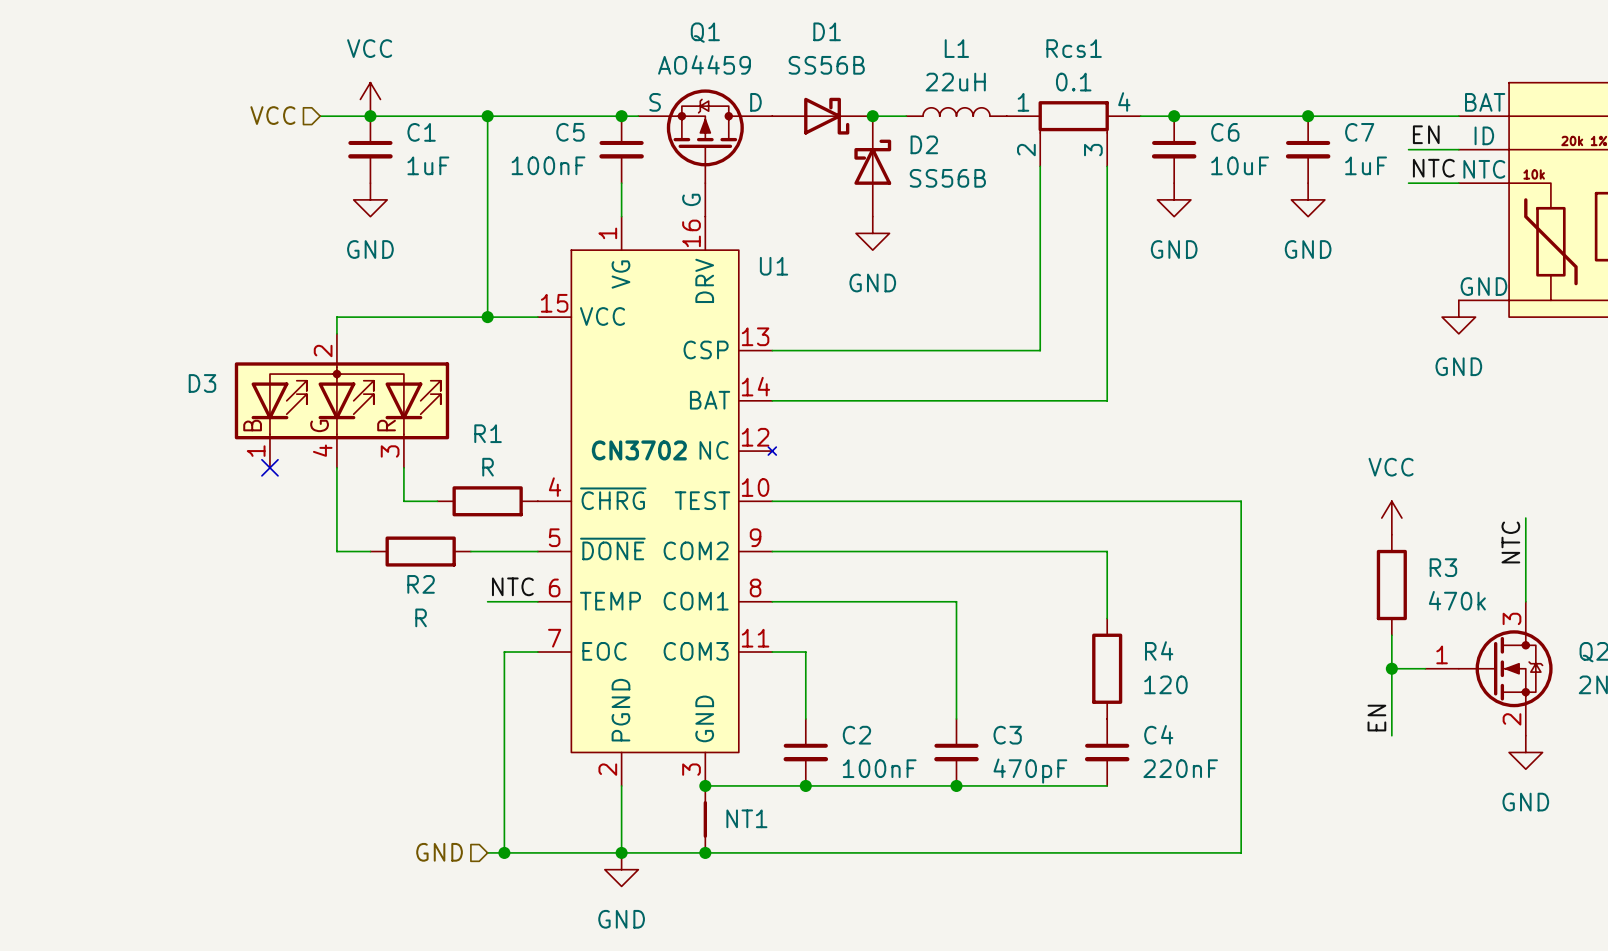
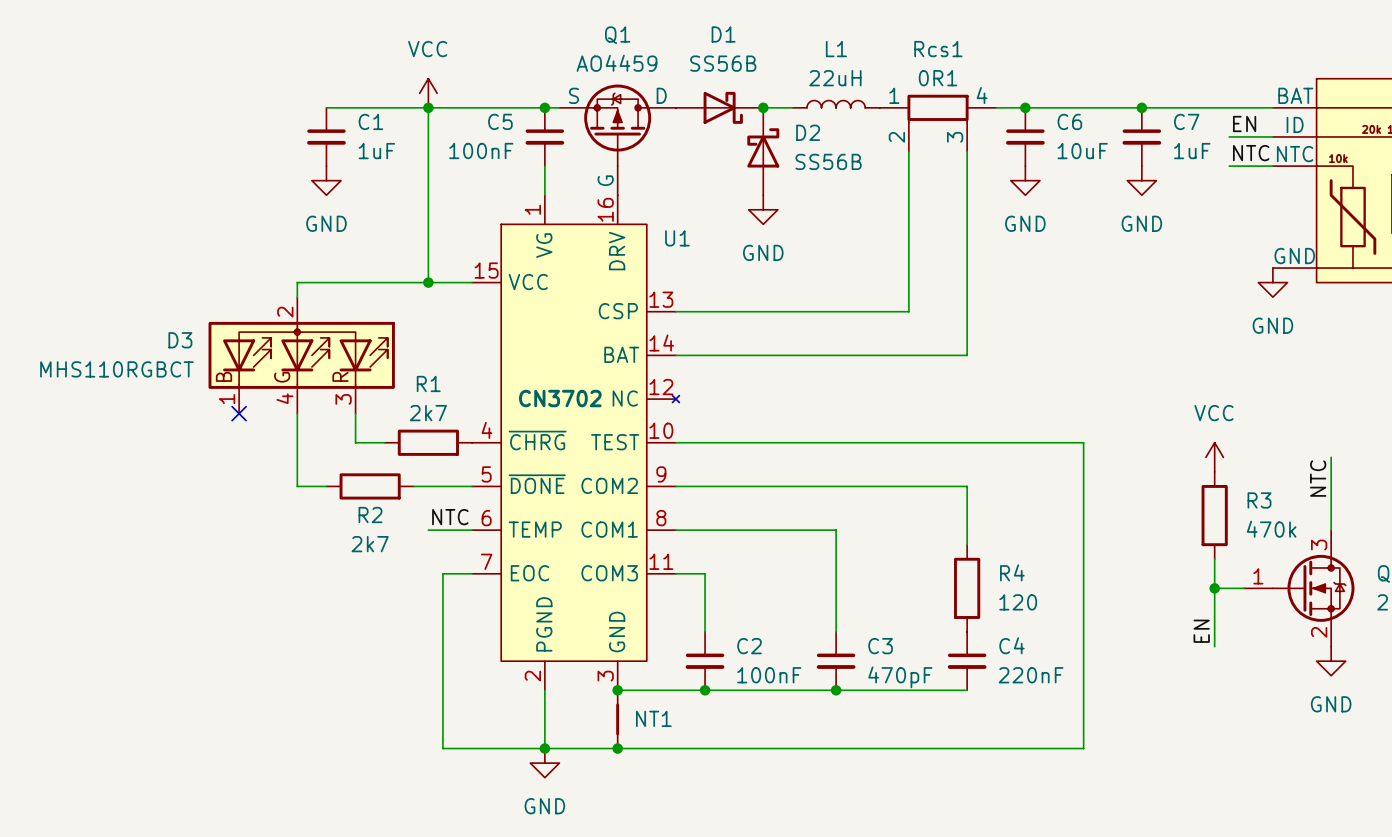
Rcs1 value: 0.1 (1073, 82) -> 0R1 (938, 78)
power symbol position: VCC (370, 99) -> VCC (428, 93)
hierarchical label: VCC (272, 115) -> none
wire: (320, 116) (370, 116) -> none
junction: (370, 116) -> none
D3 value: none -> MHS110RGBCT (116, 369)
R1 value: R (488, 467) -> 2k7 (428, 413)
R2 value: R (421, 617) -> 2k7 (370, 544)
hierarchical label: GND (439, 852) -> none
wire: (487, 852) (504, 852) -> none
junction: (504, 852) -> none

